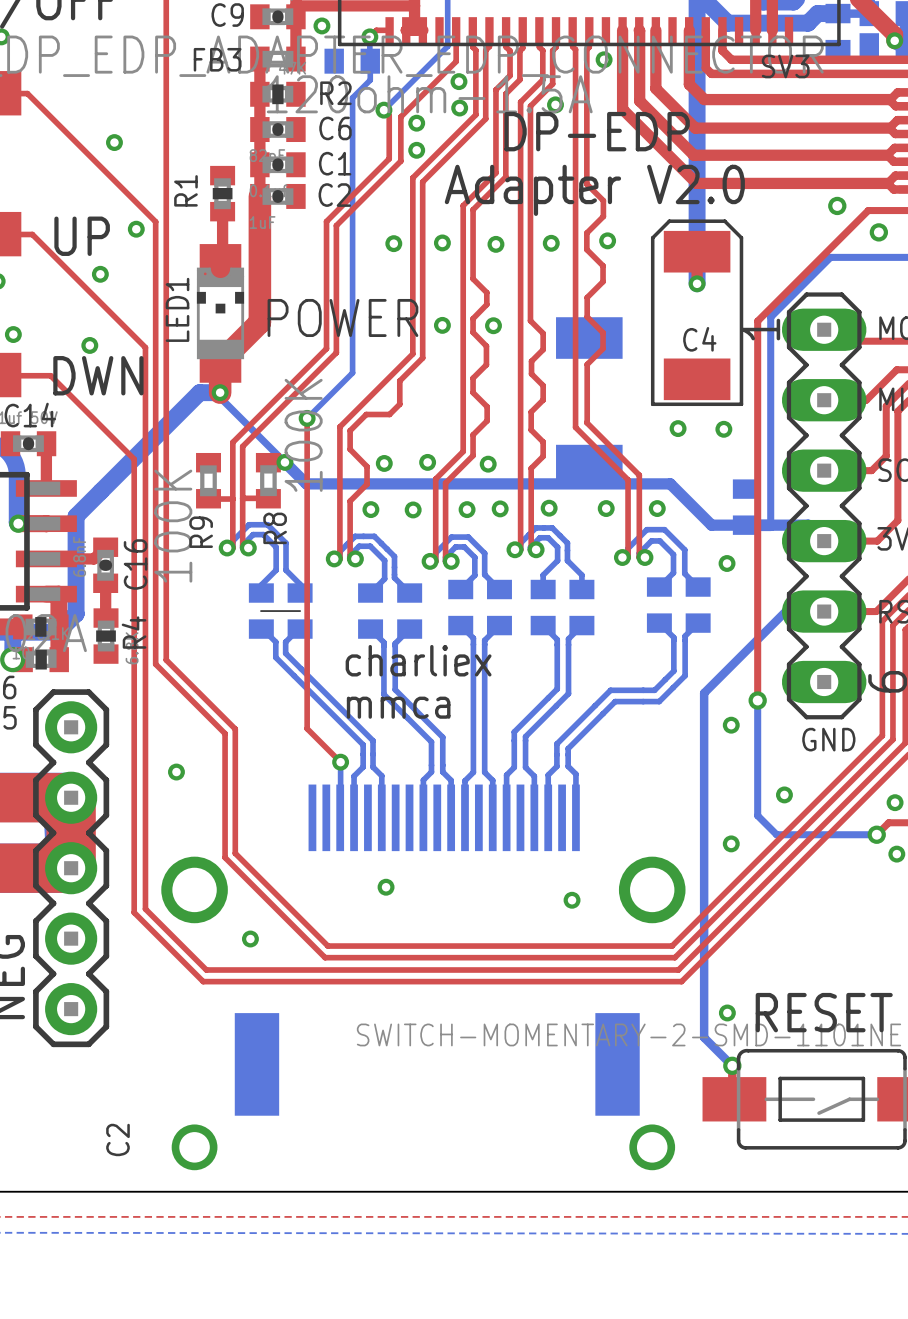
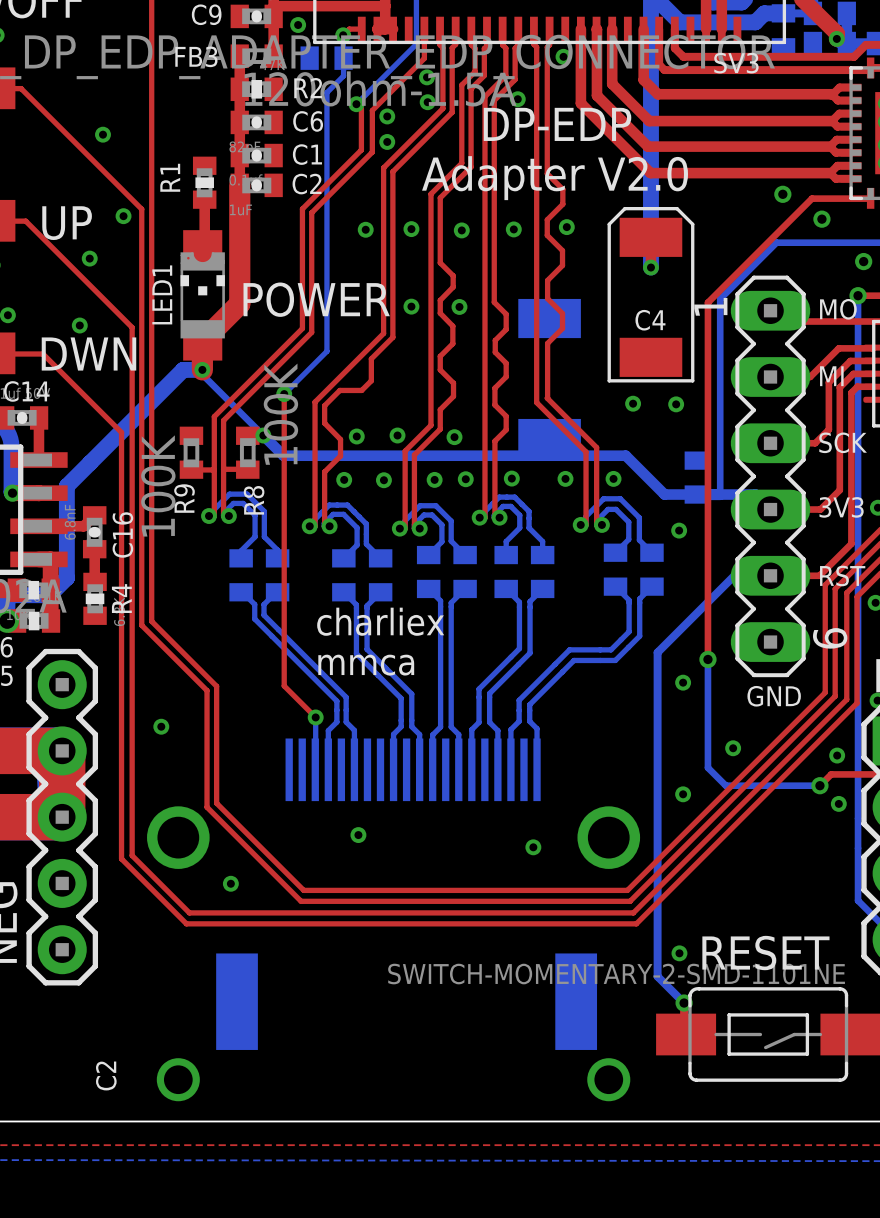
line: (261, 611) (300, 611) -> none

